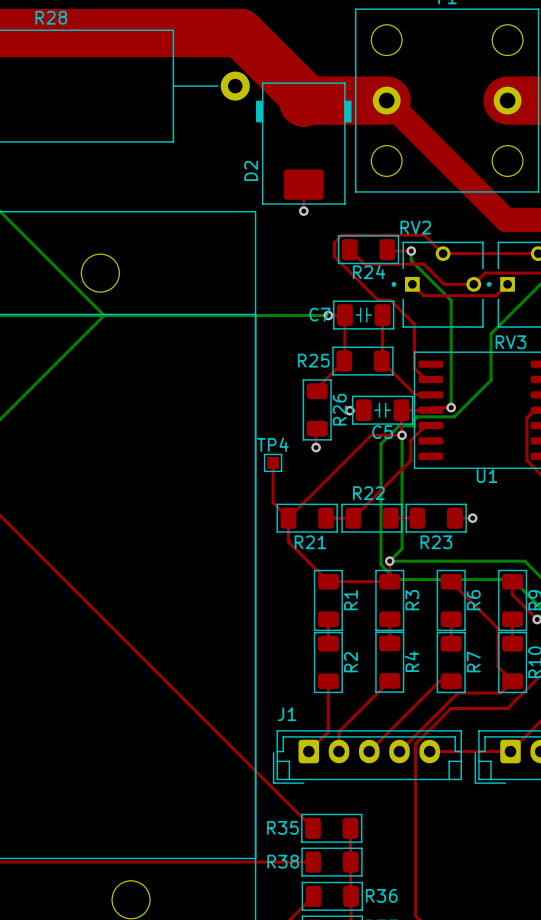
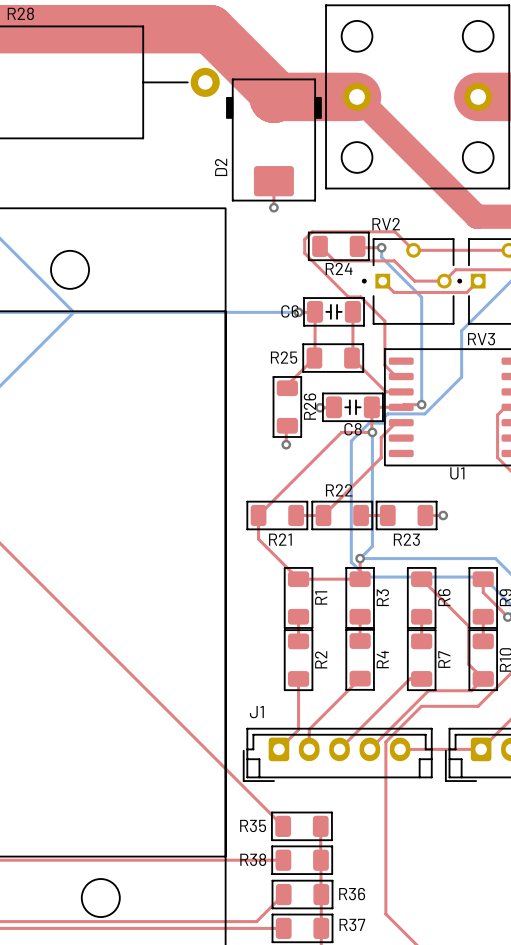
C7 name: C7 (319, 314) -> C6 (290, 311)
C5 name: C5 (382, 432) -> C8 (353, 429)
top track: (273, 462) (273, 502) (288, 518) -> none
TP4: (273, 462) -> none

